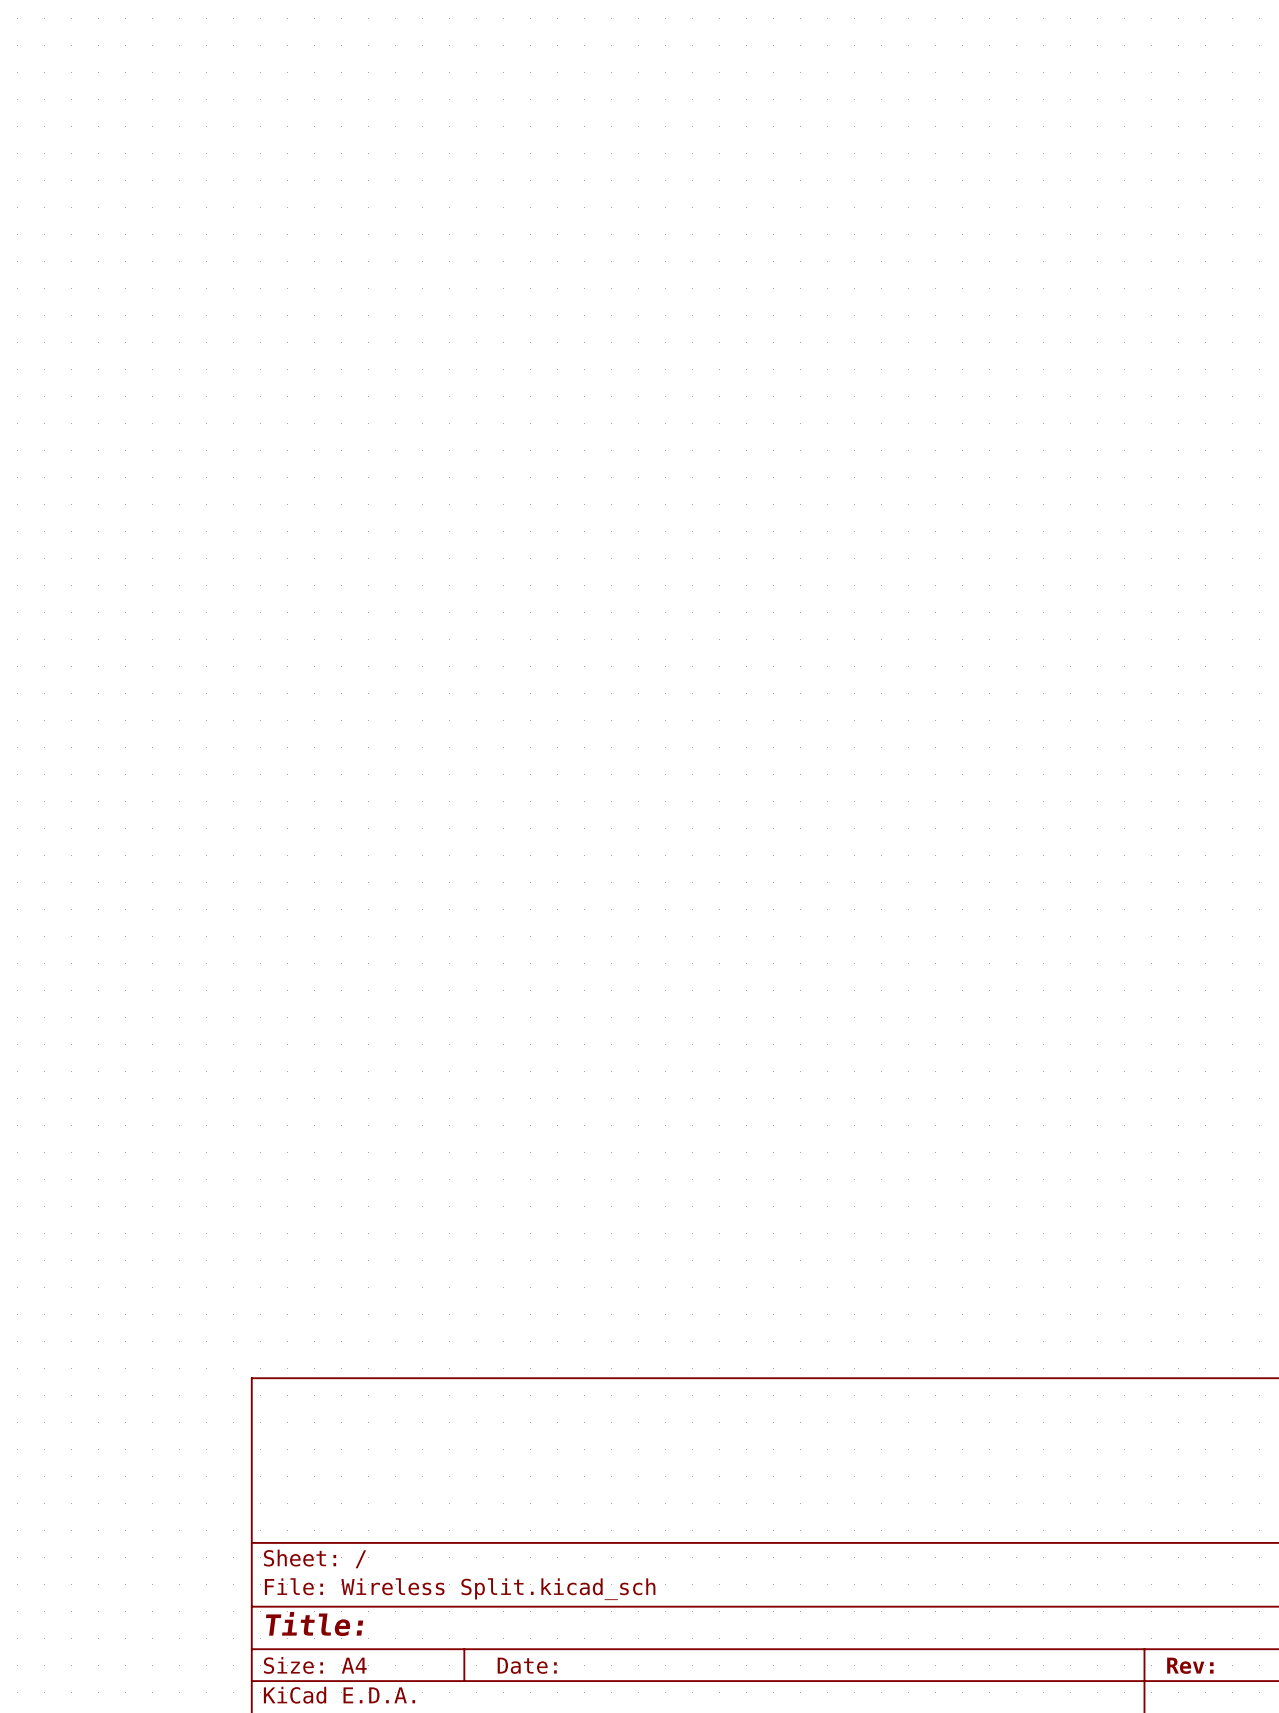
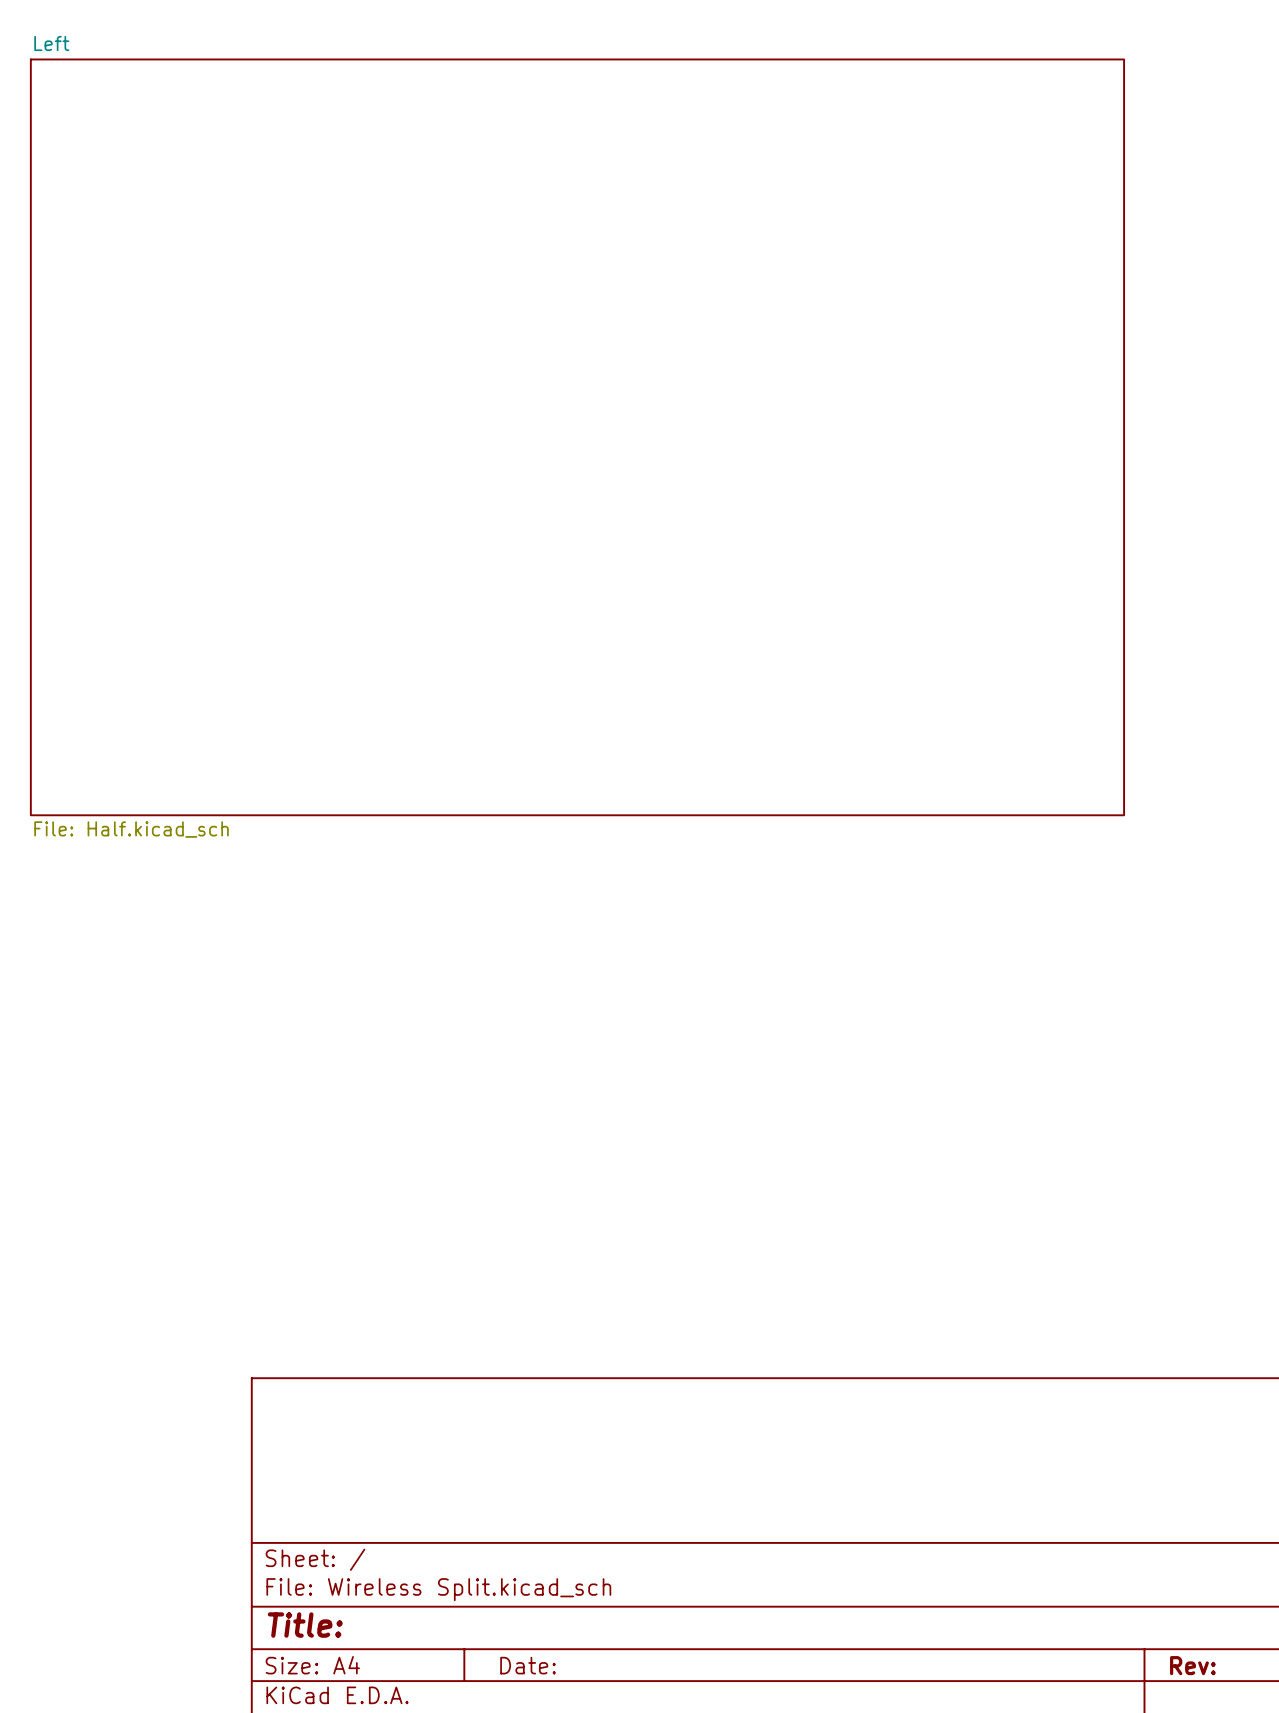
sheet Left: none -> File: Half.kicad_sch (577, 437)

